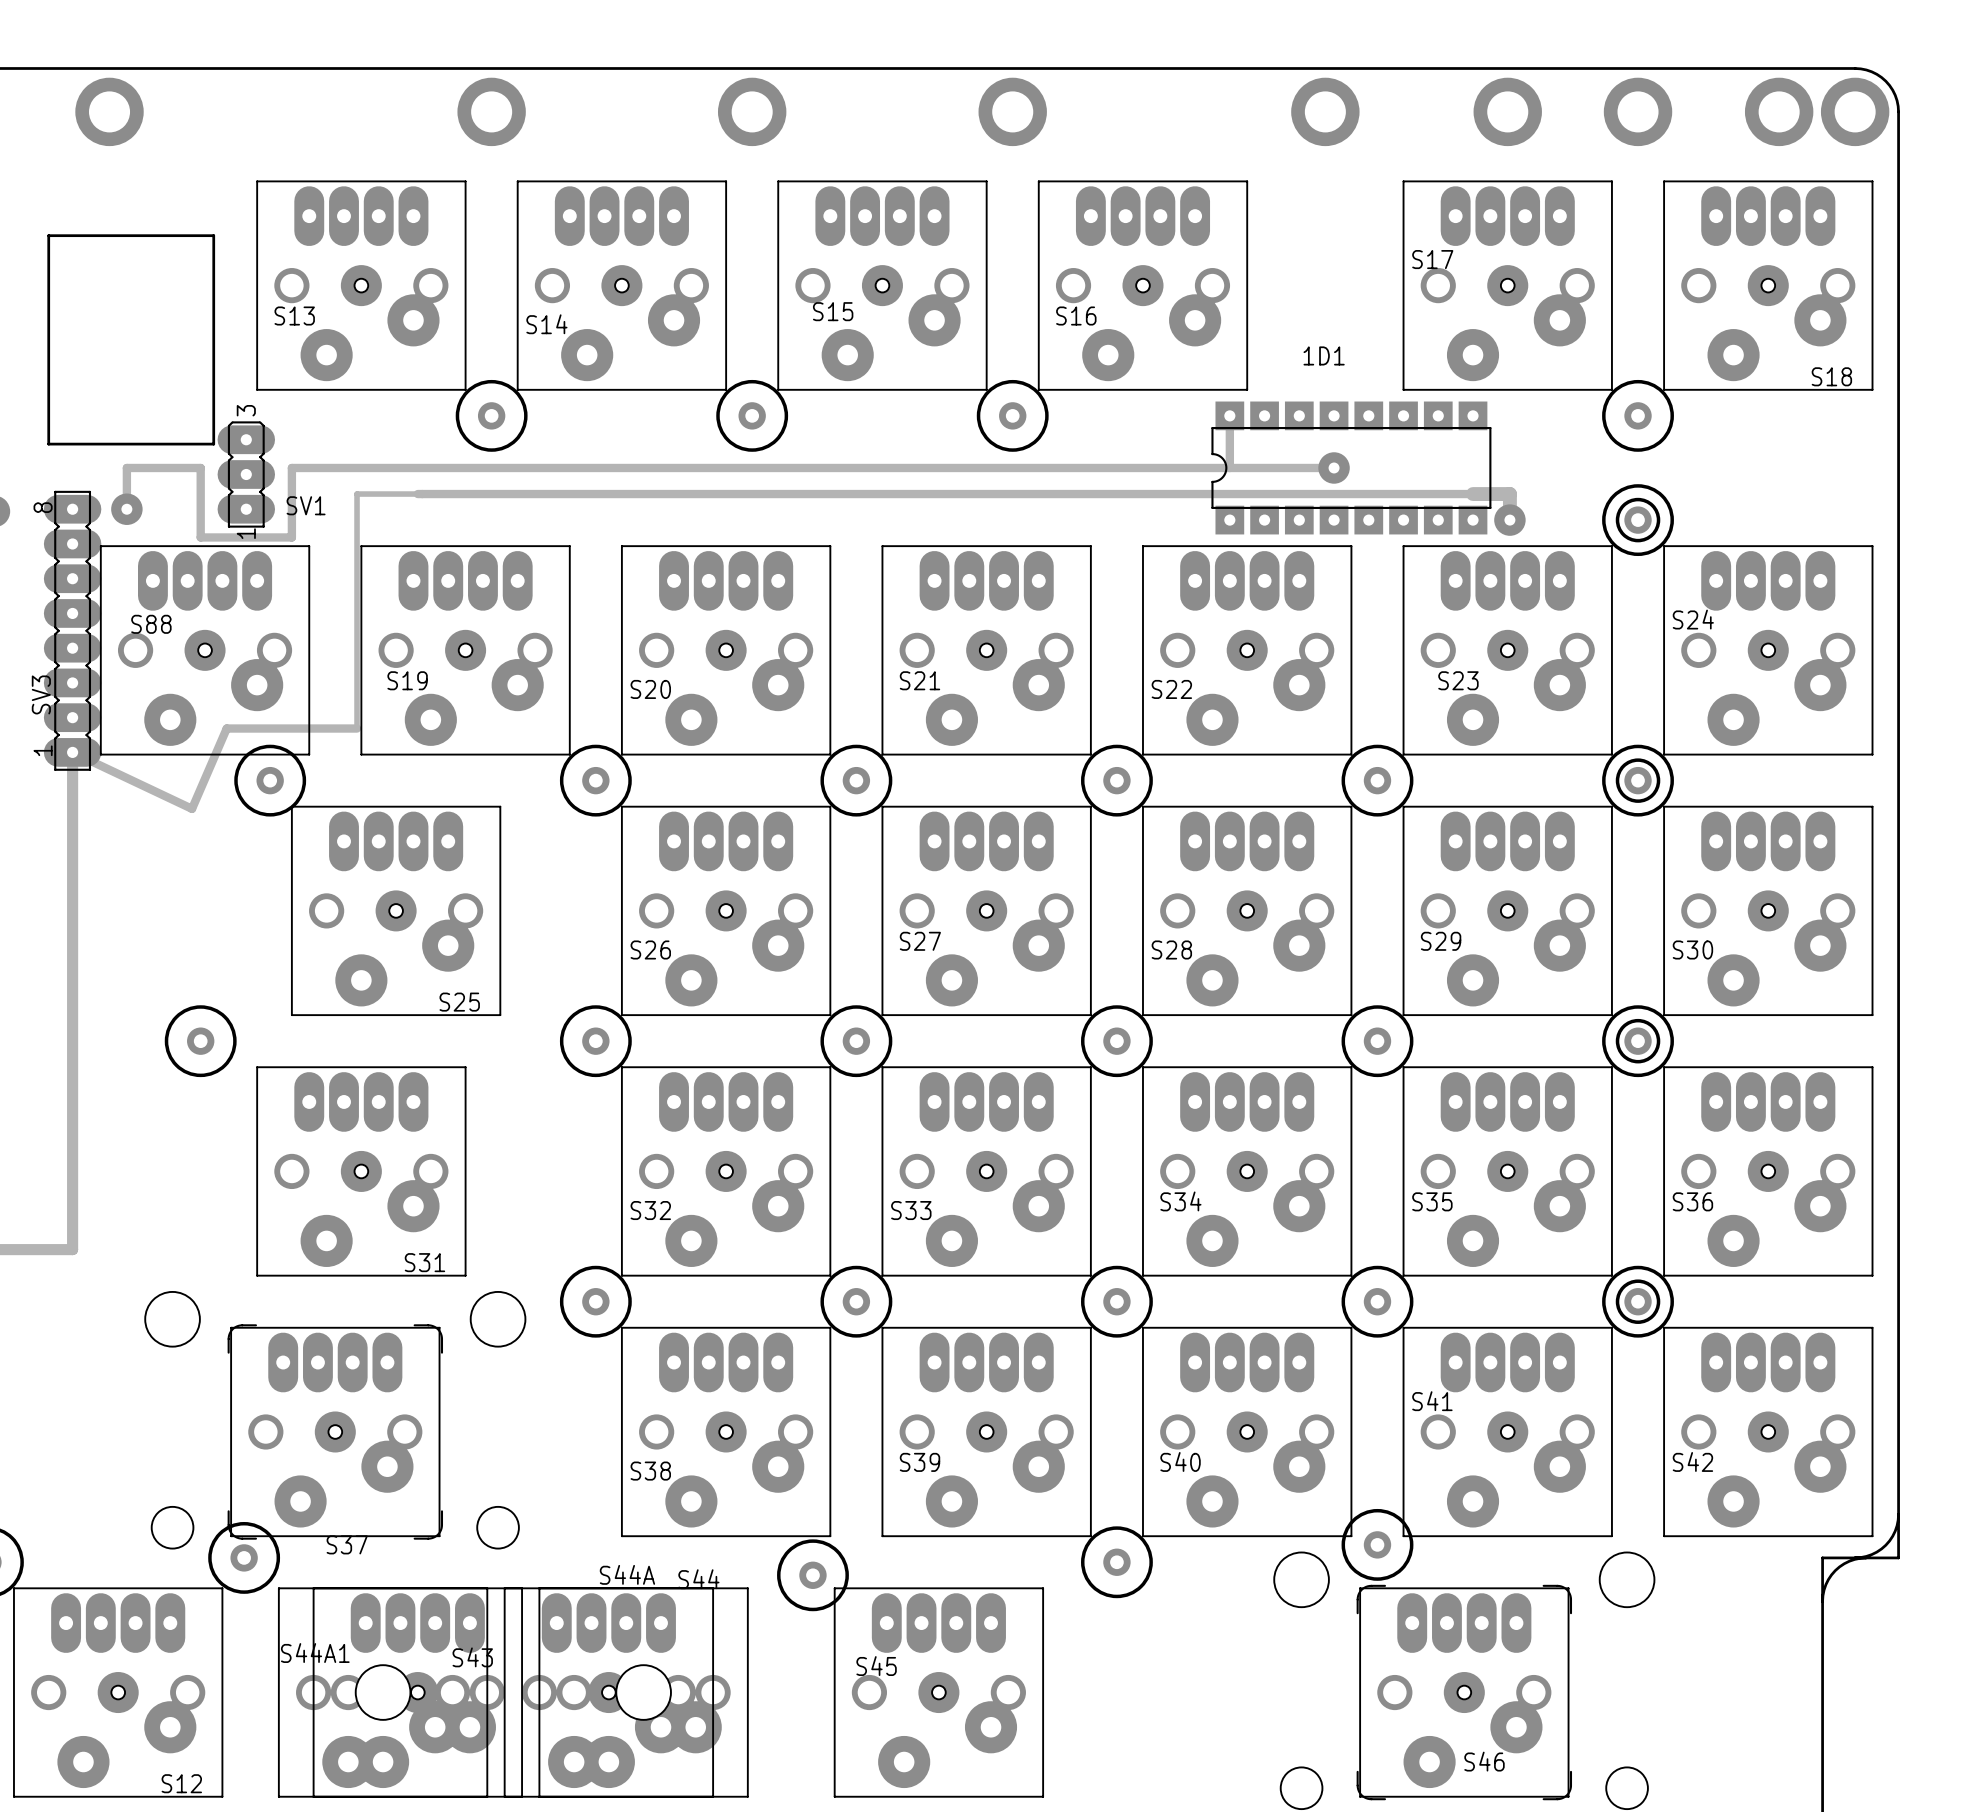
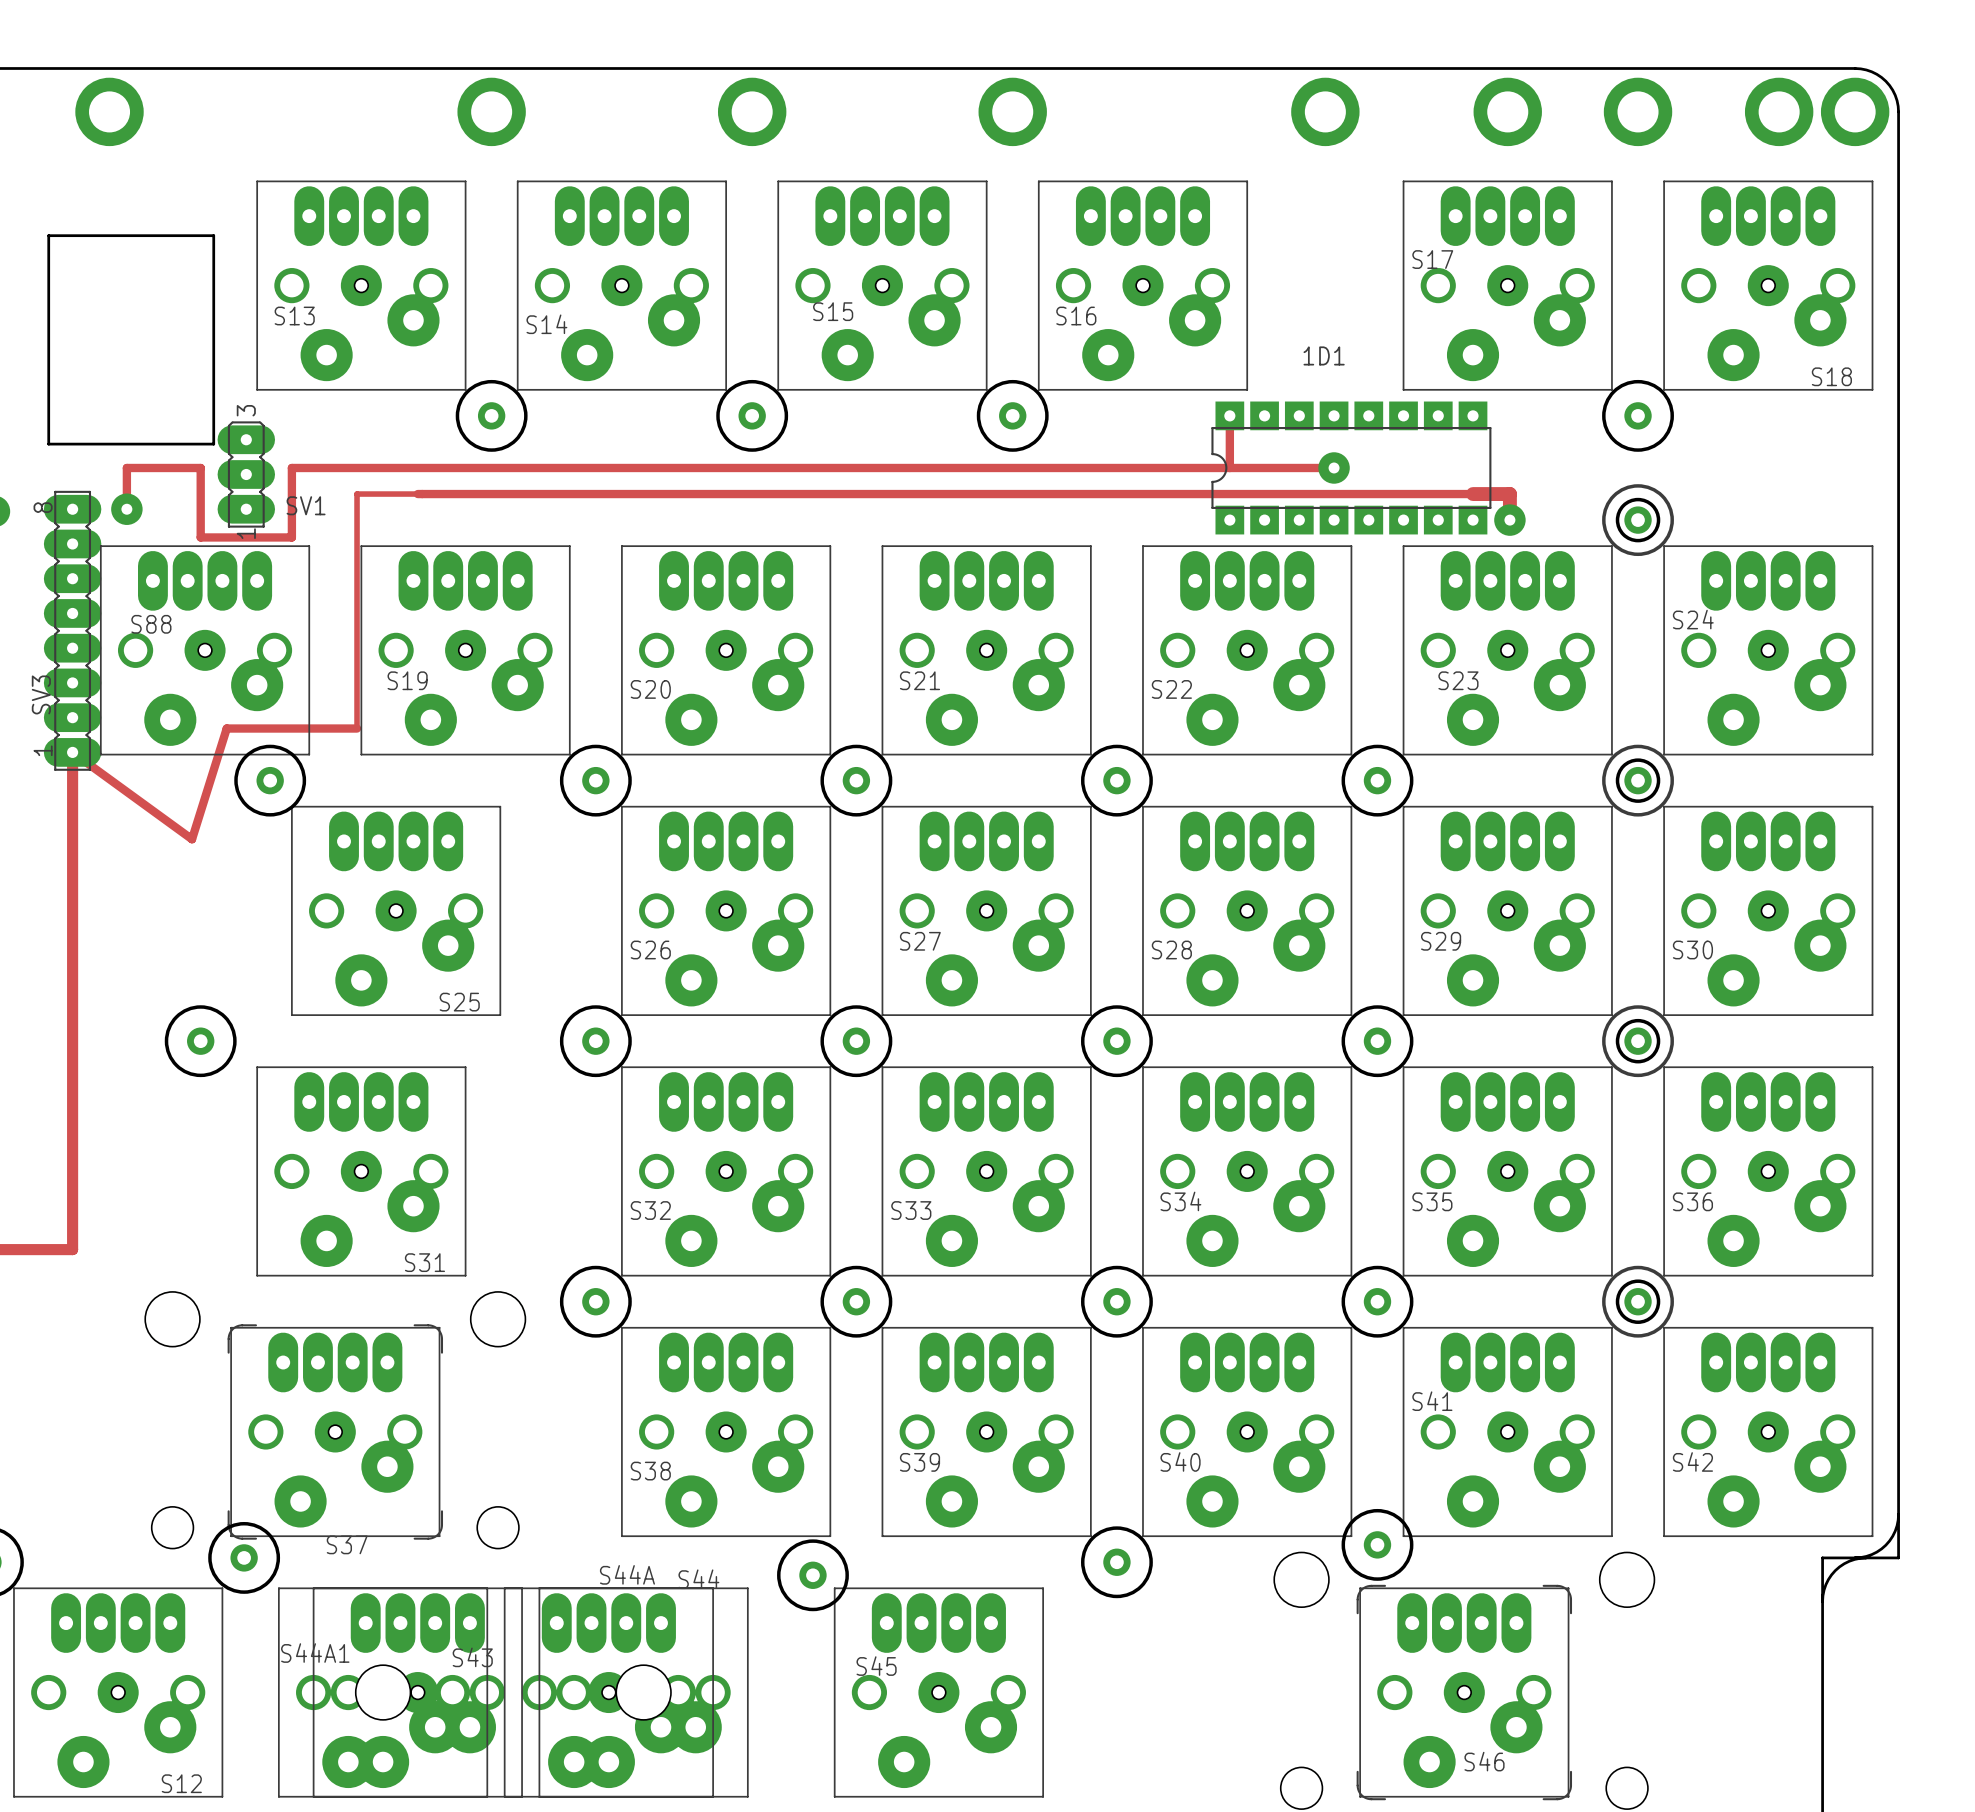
track: (226, 728) (192, 808) (72, 752) -> (226, 728) (192, 839) (72, 752)

